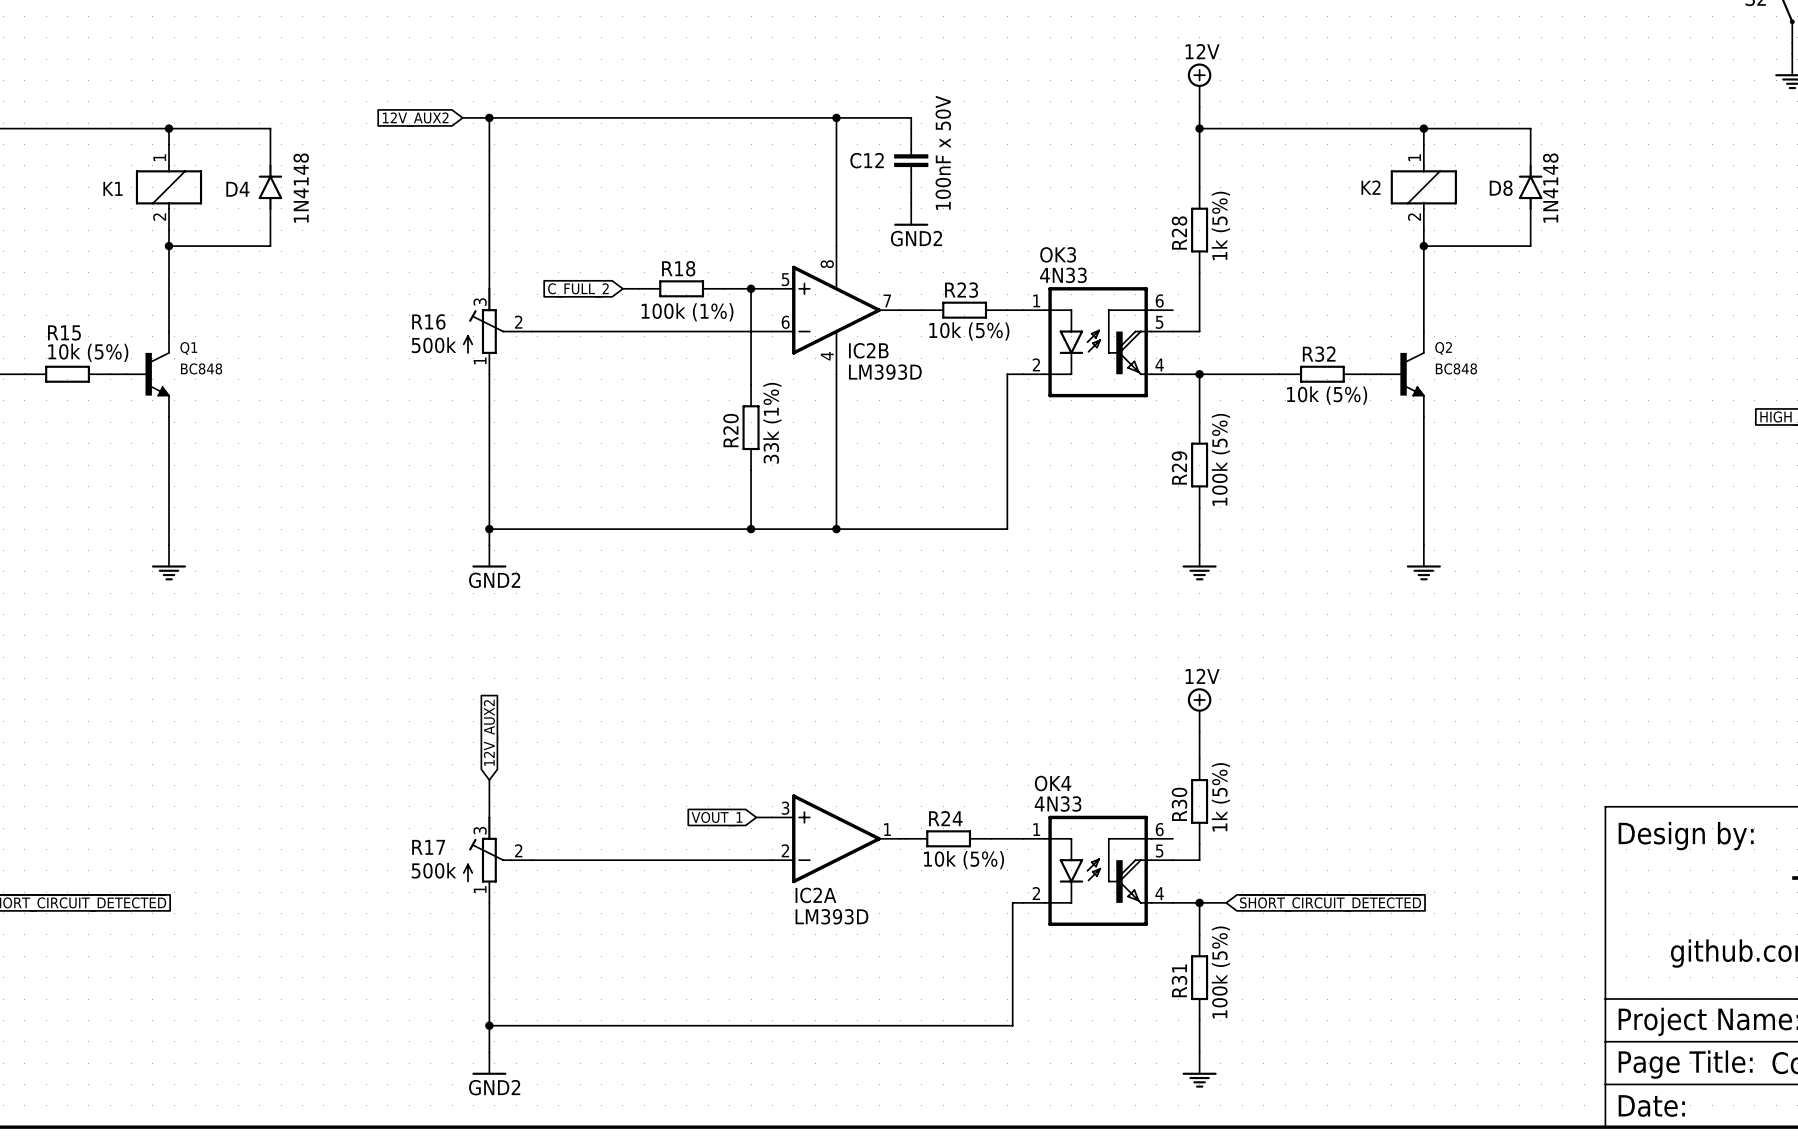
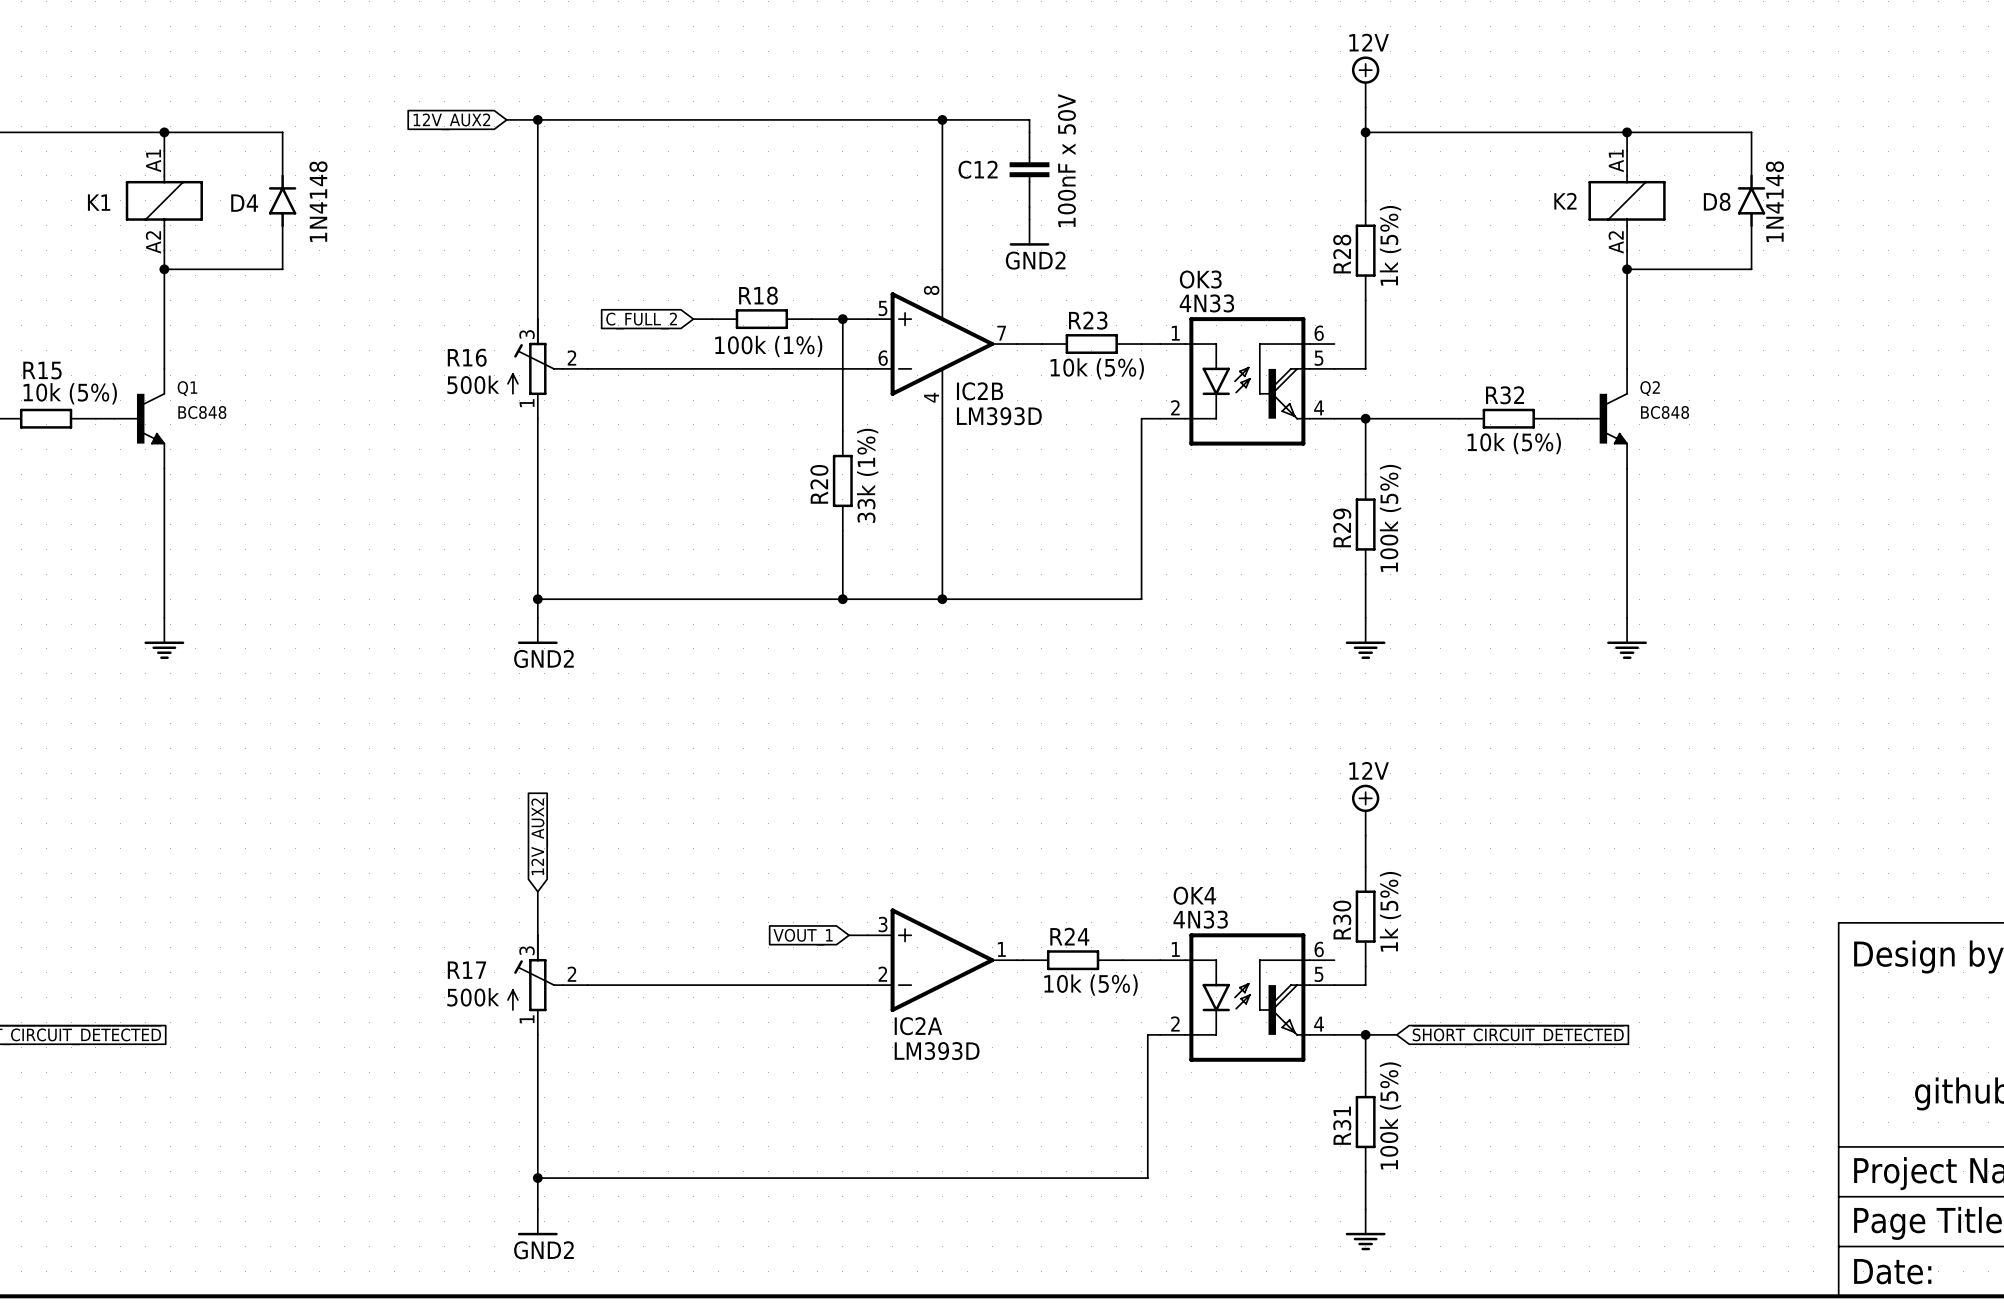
K1 pin number: 1 (159, 157) -> A1 (153, 160)
K2 pin number: 1 (1414, 157) -> A1 (1616, 160)
K1 pin number: 2 (159, 217) -> A2 (153, 242)
K2 pin number: 2 (1414, 217) -> A2 (1616, 242)

